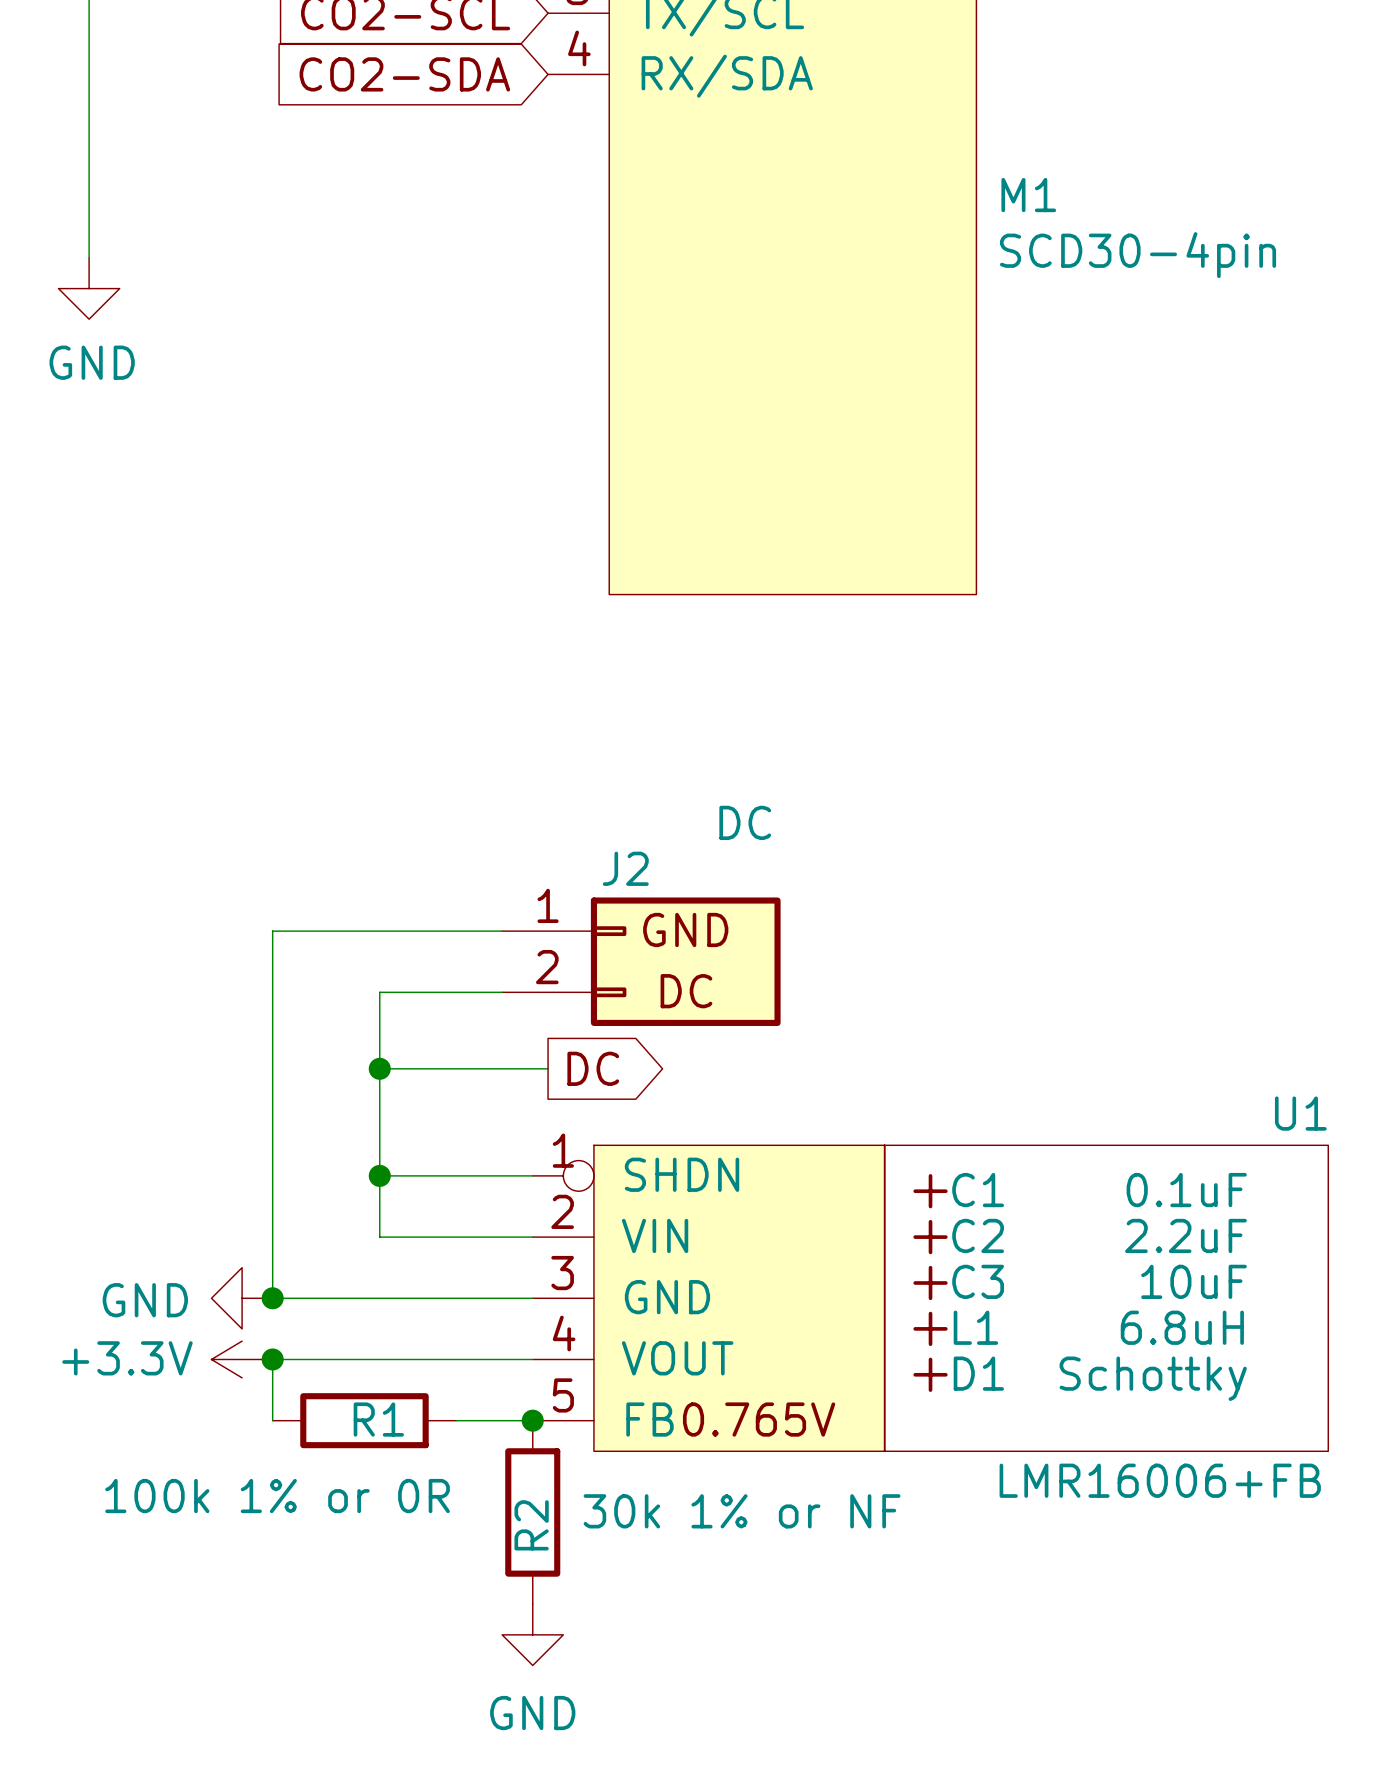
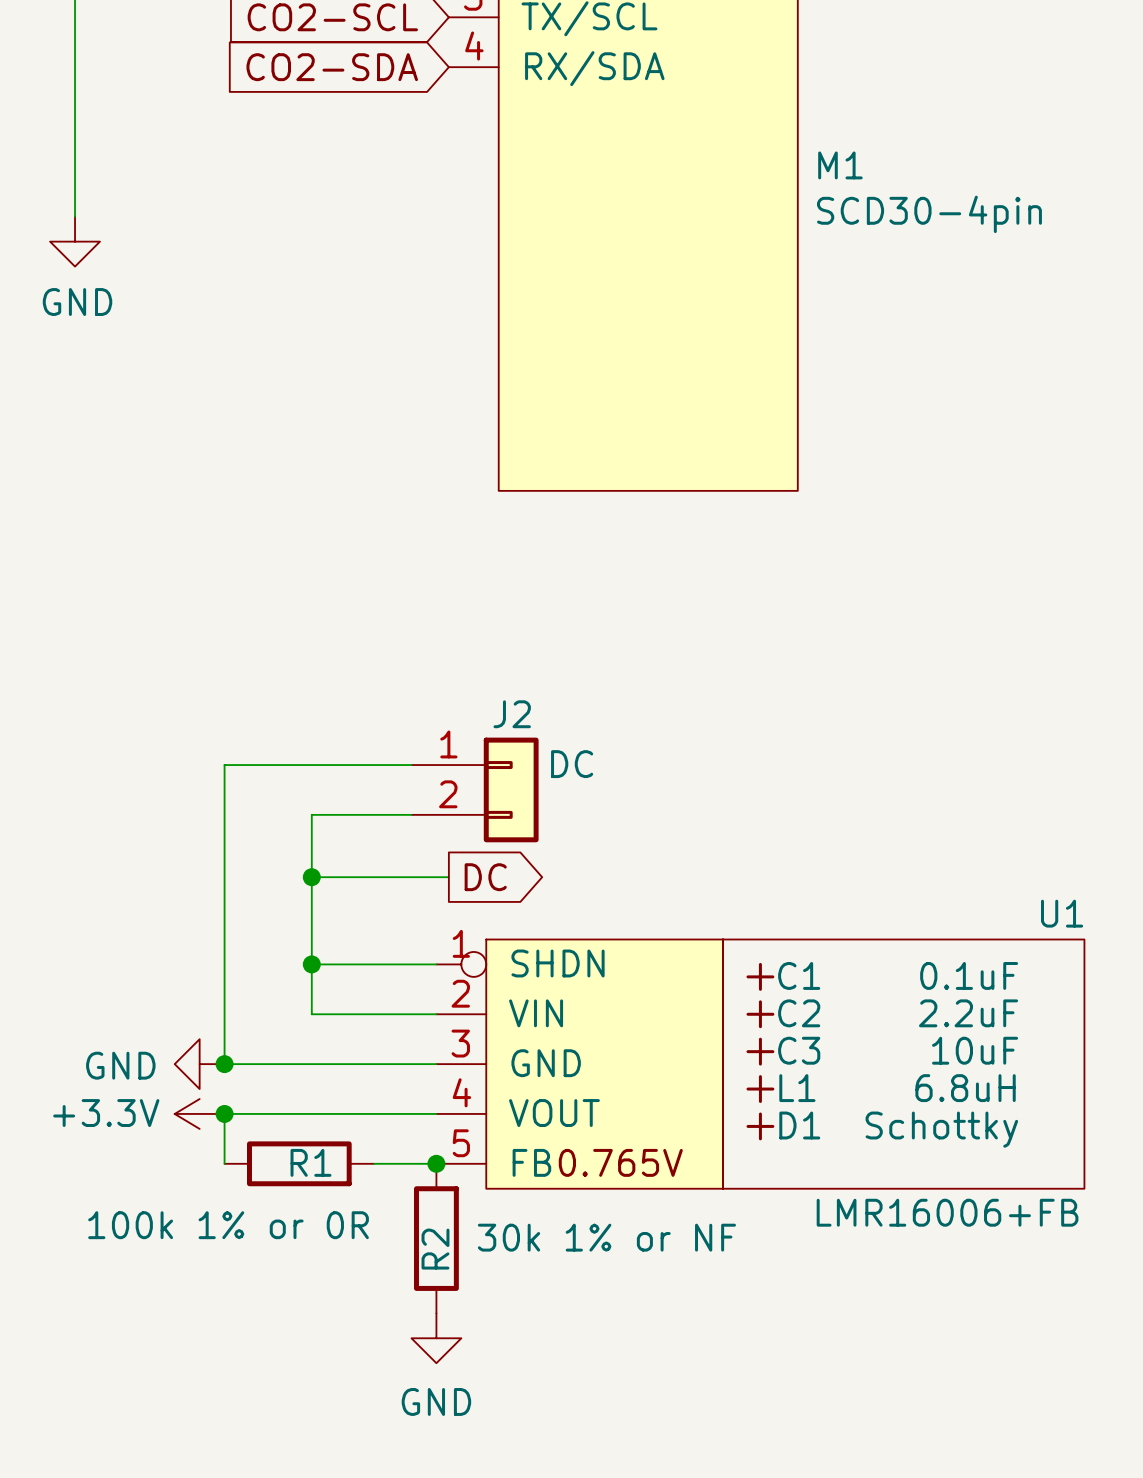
J2 value position: DC (745, 822) -> DC (572, 764)
J2 symbol: [502, 897, 781, 1026] -> [411, 737, 539, 843]

